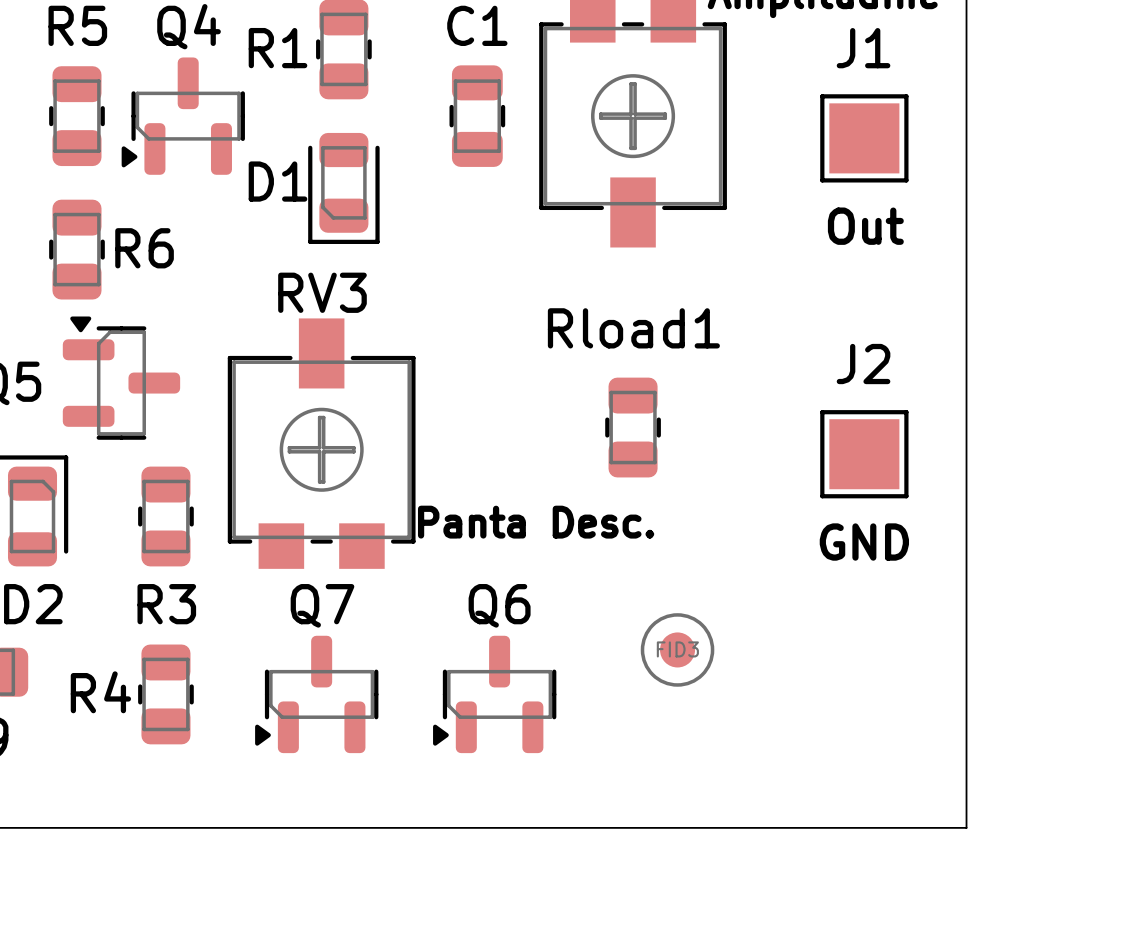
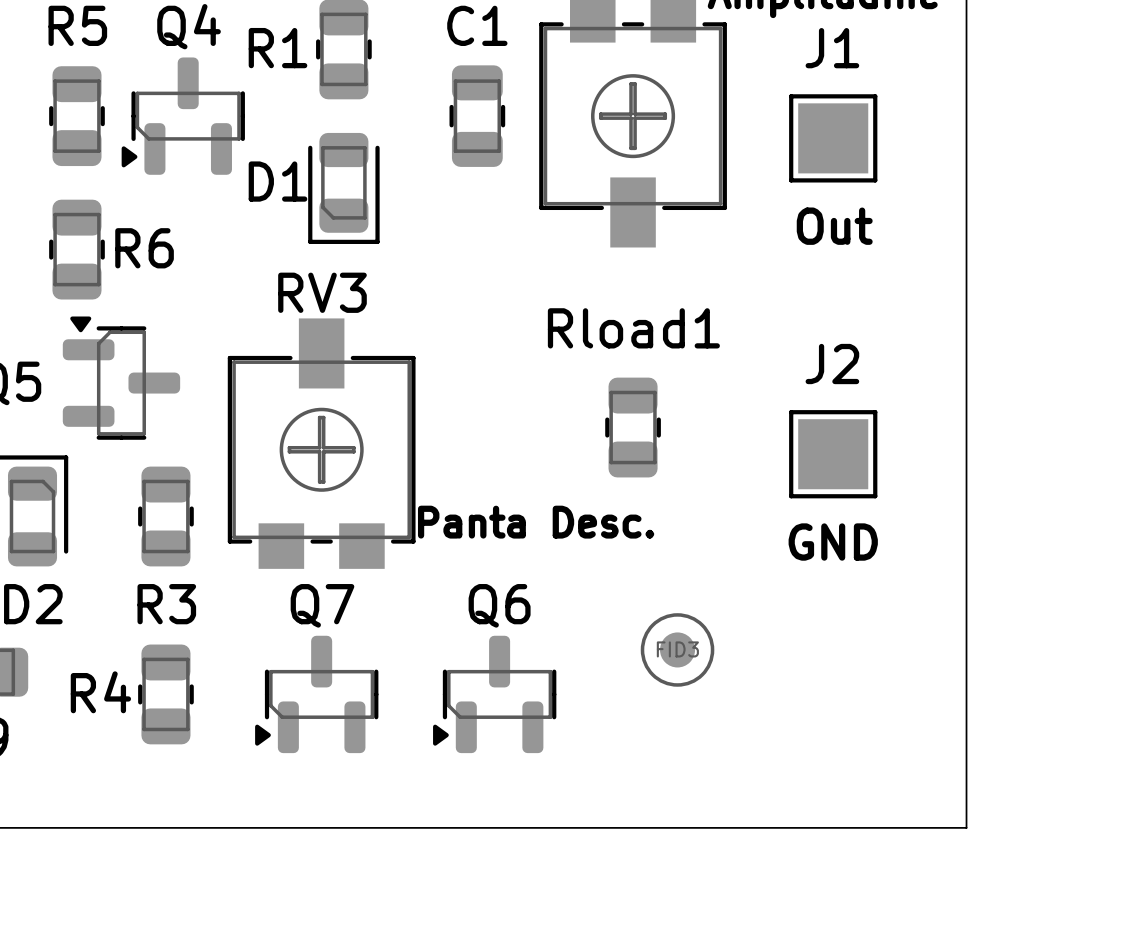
J1 position: (864, 138) -> (833, 138)
J2 position: (864, 454) -> (833, 454)

